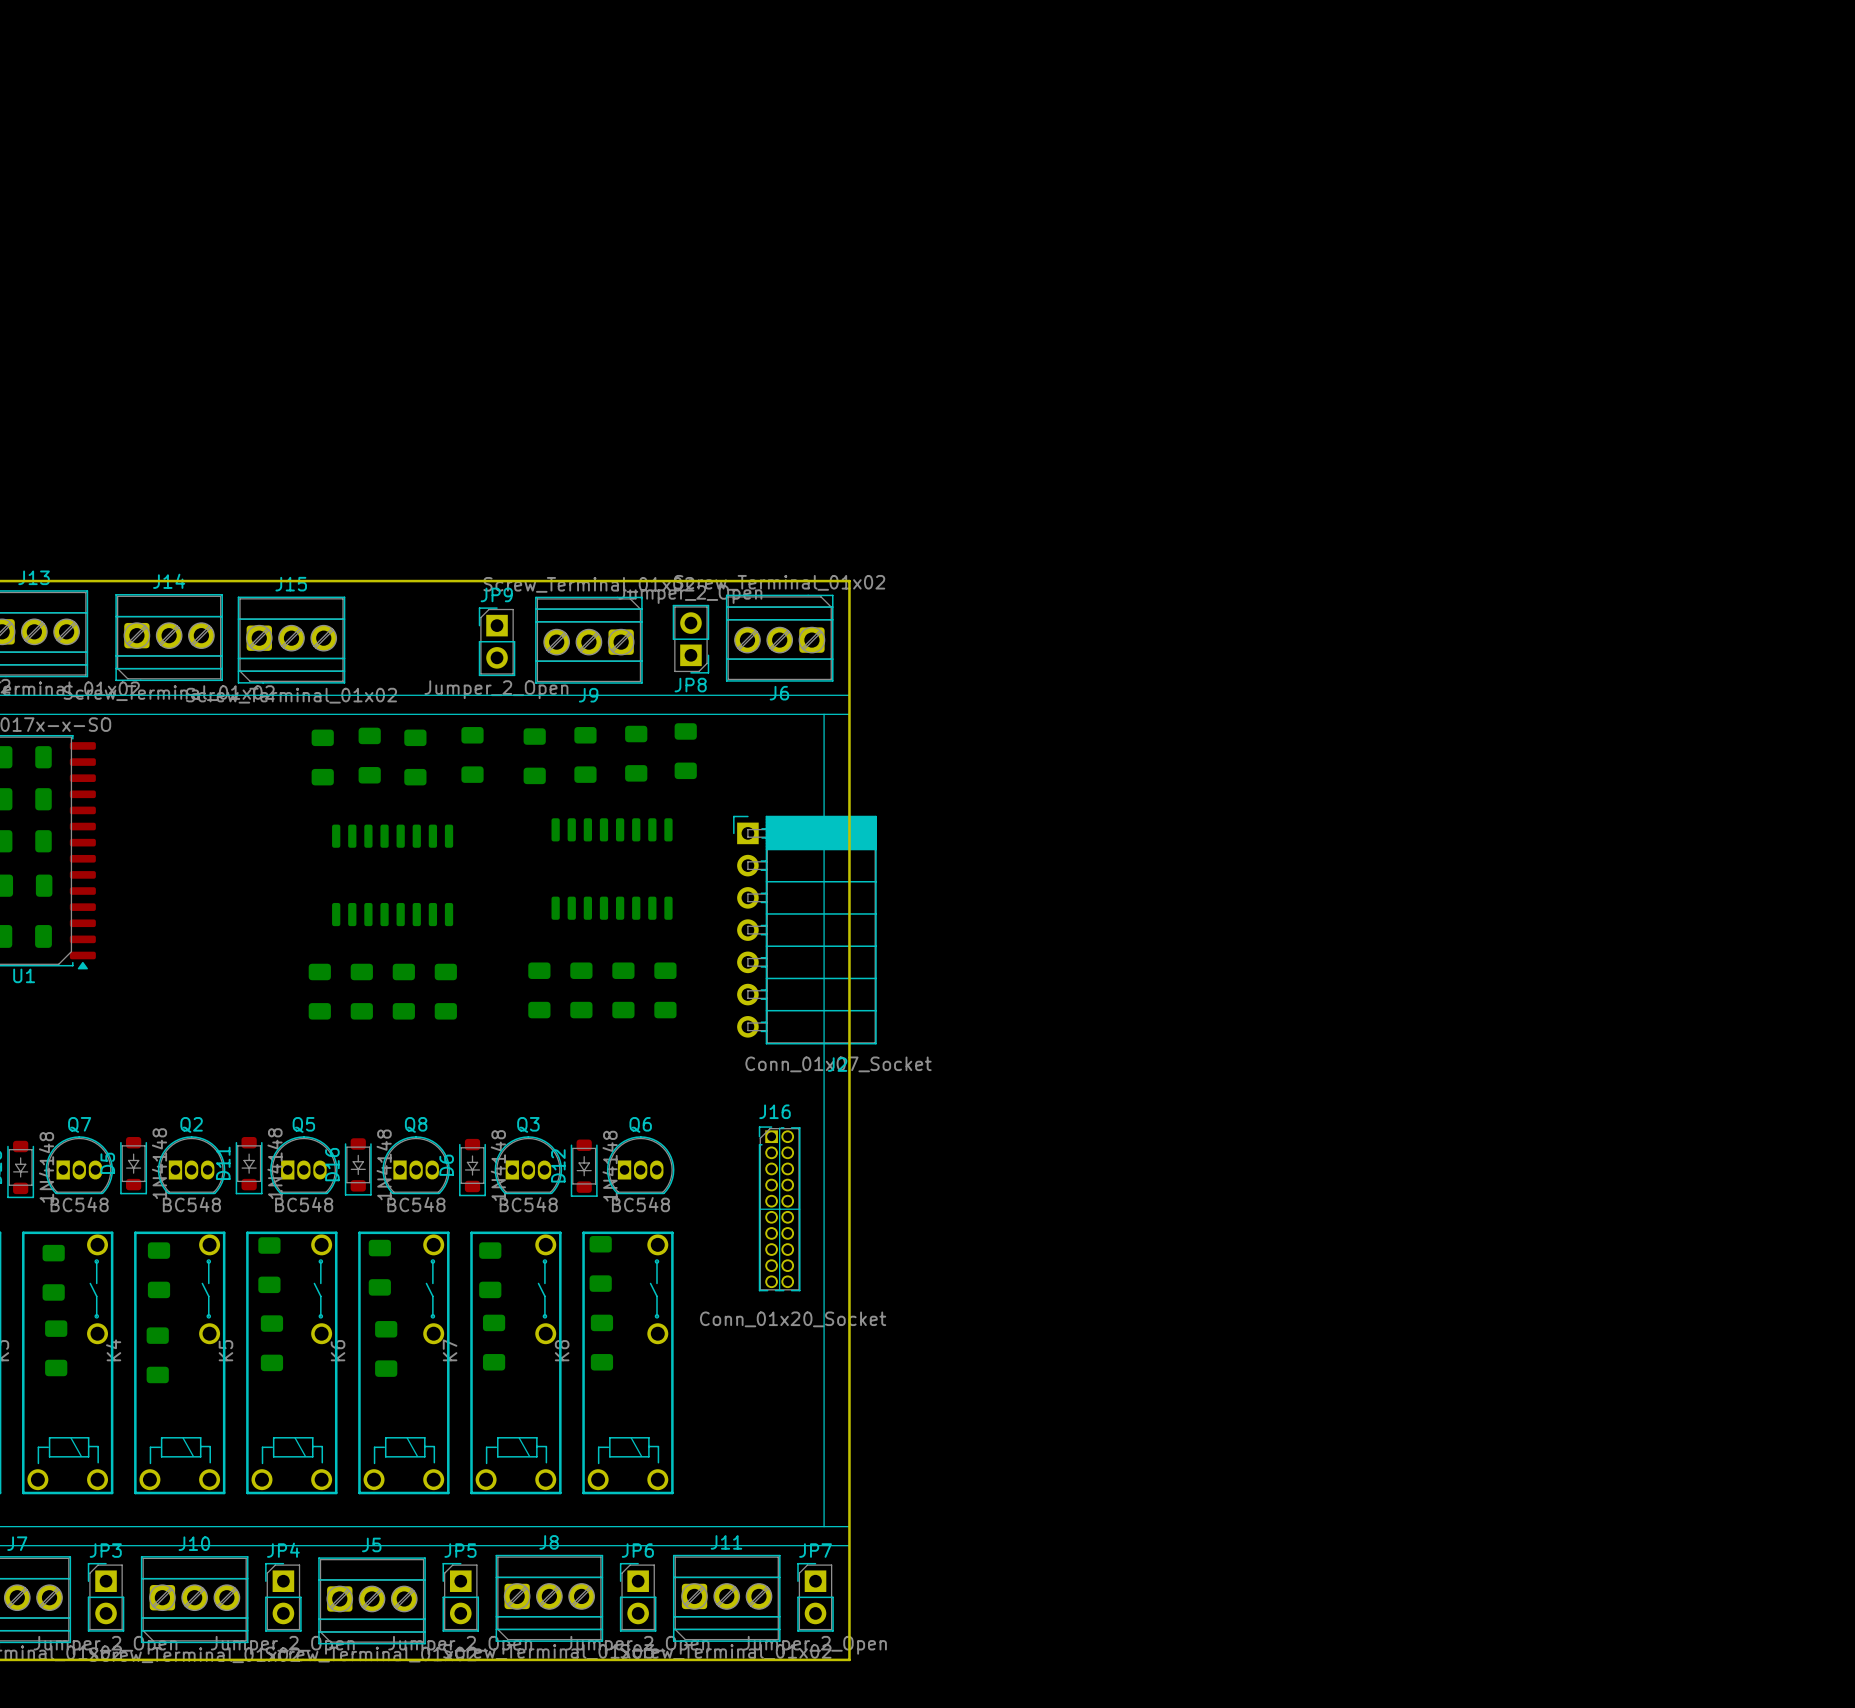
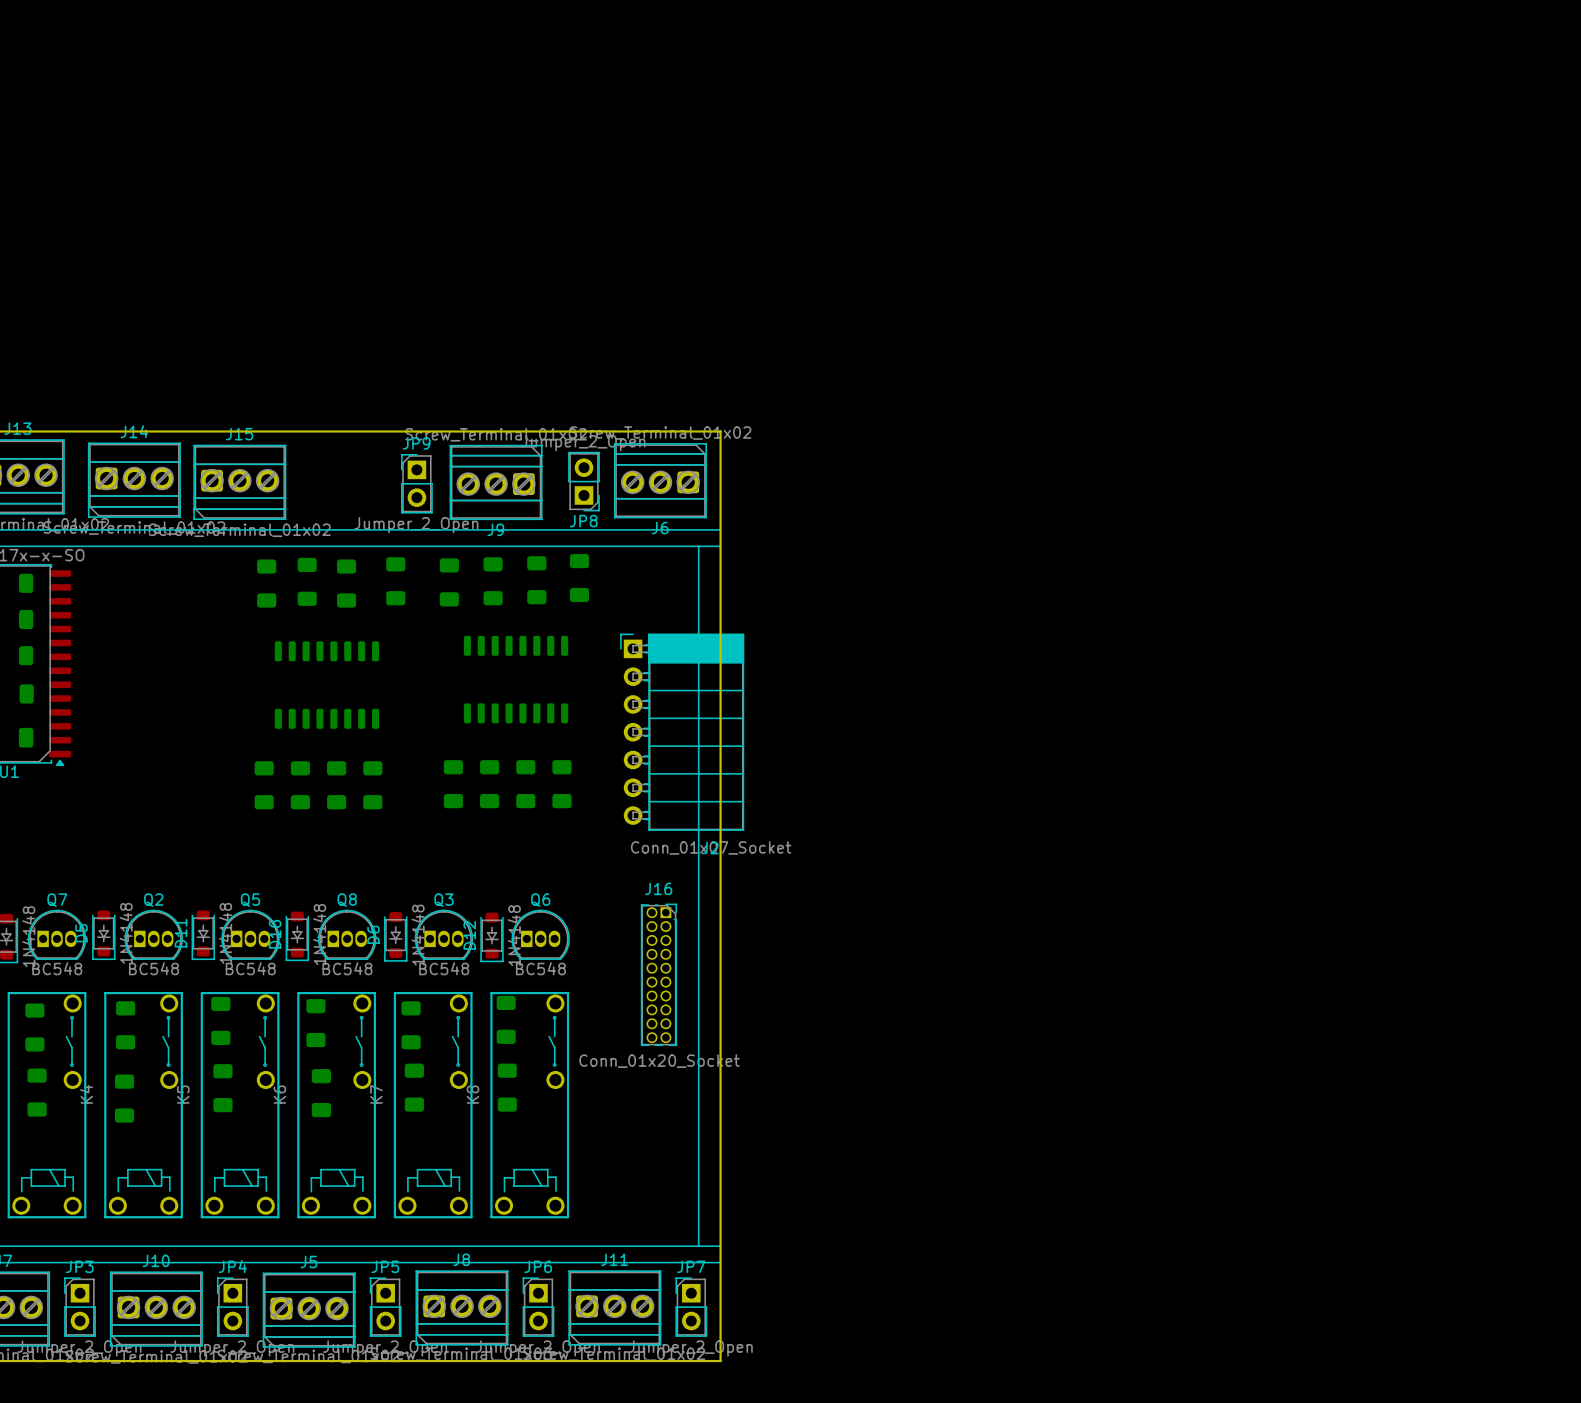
J16 footprint: [758, 1126, 801, 1292] -> [640, 903, 677, 1046]

